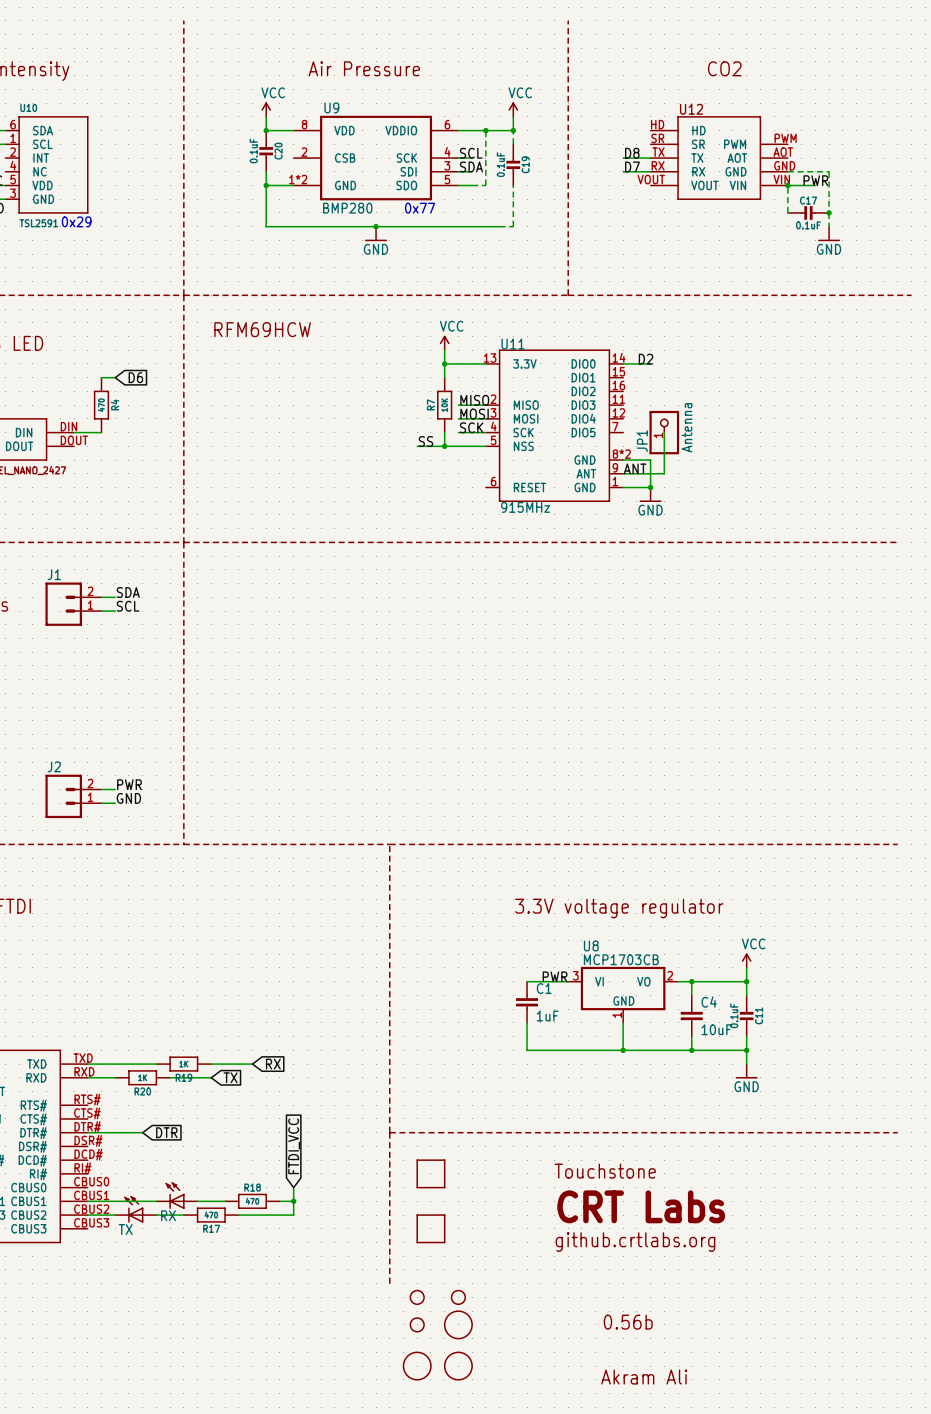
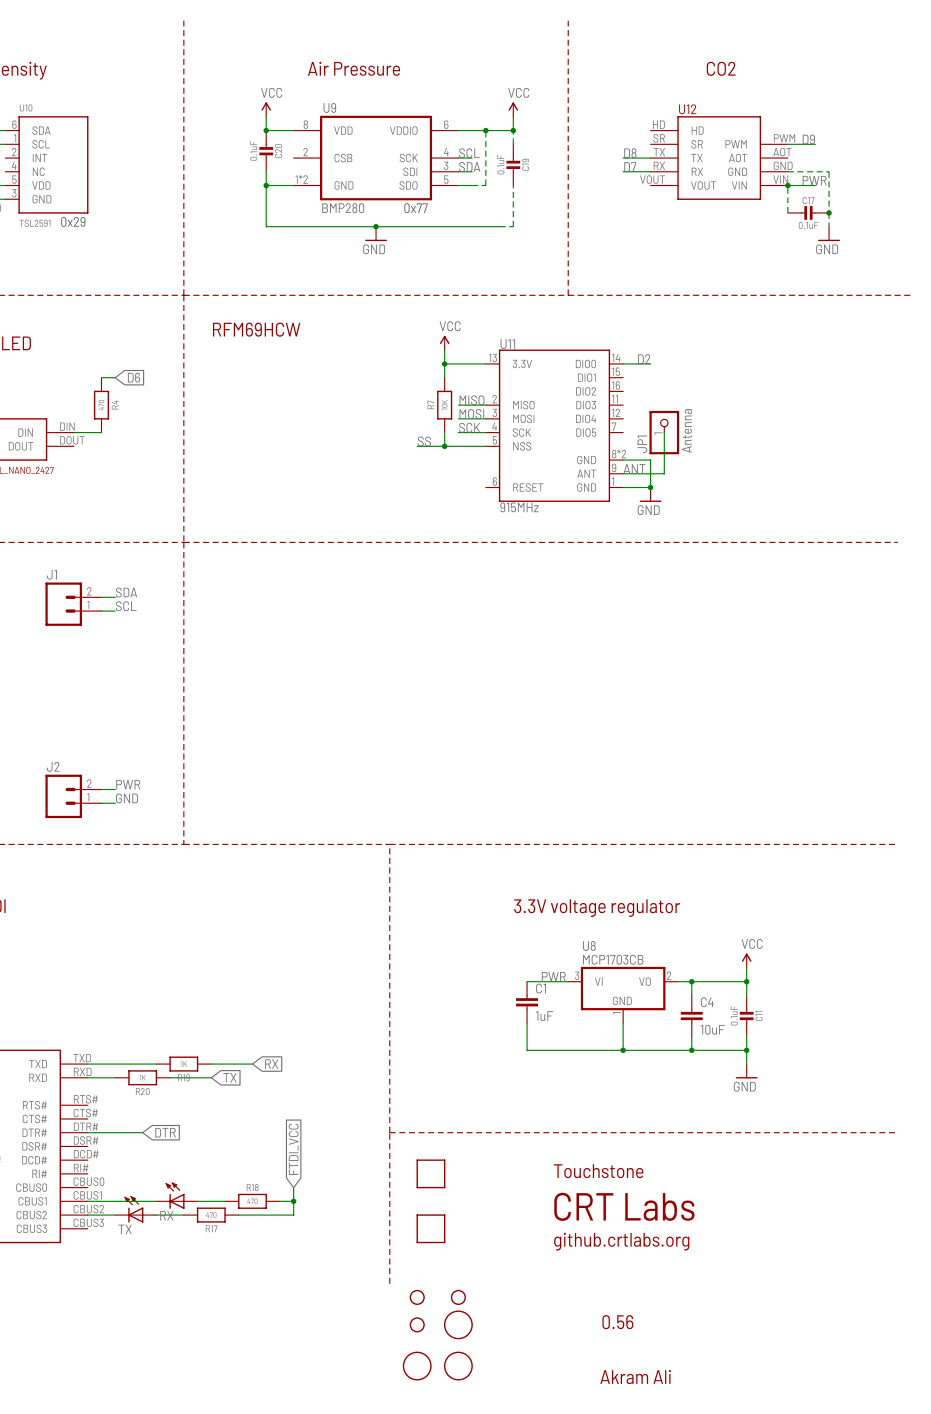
label: none -> D9 (808, 139)
wire: none -> (787, 144) (815, 144)
text: 0.56b (628, 1322) -> 0.56 (617, 1322)

